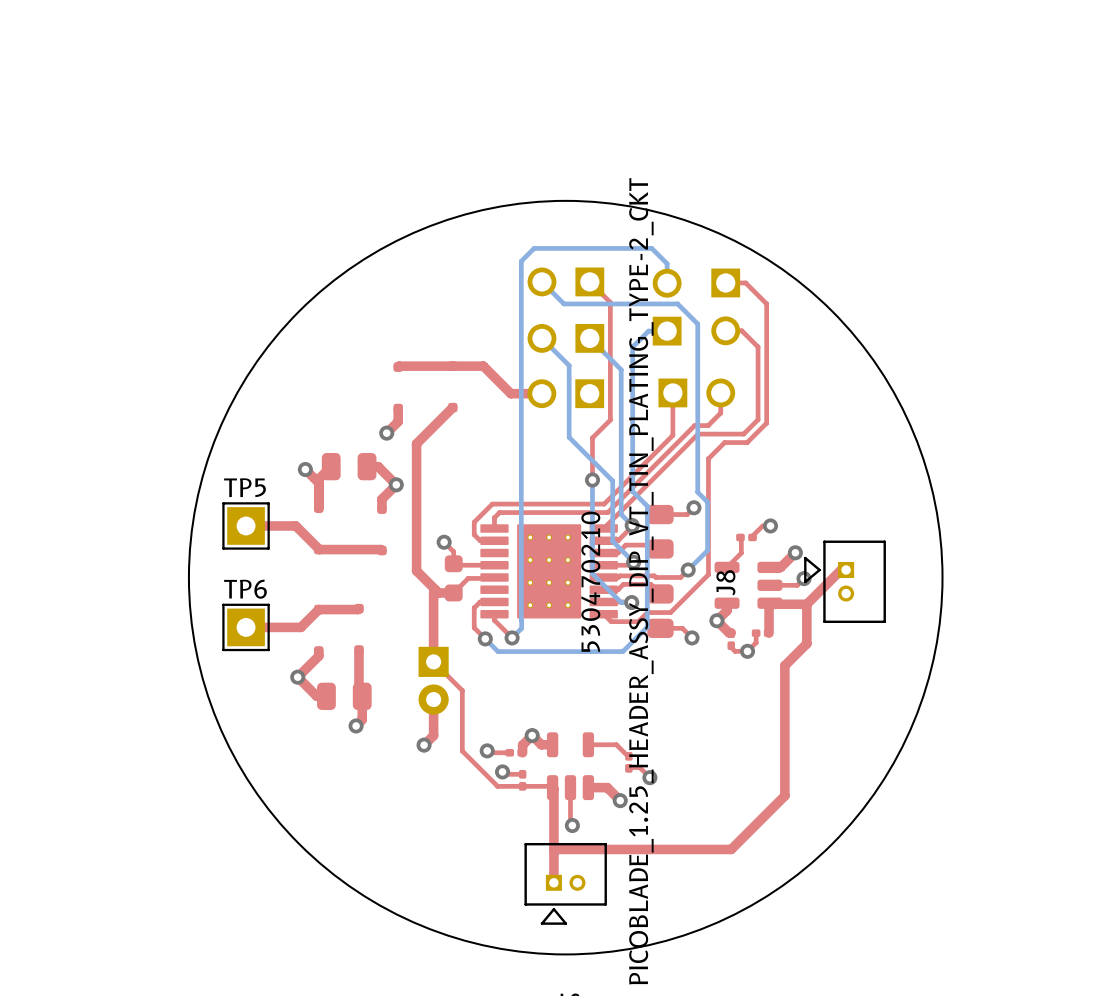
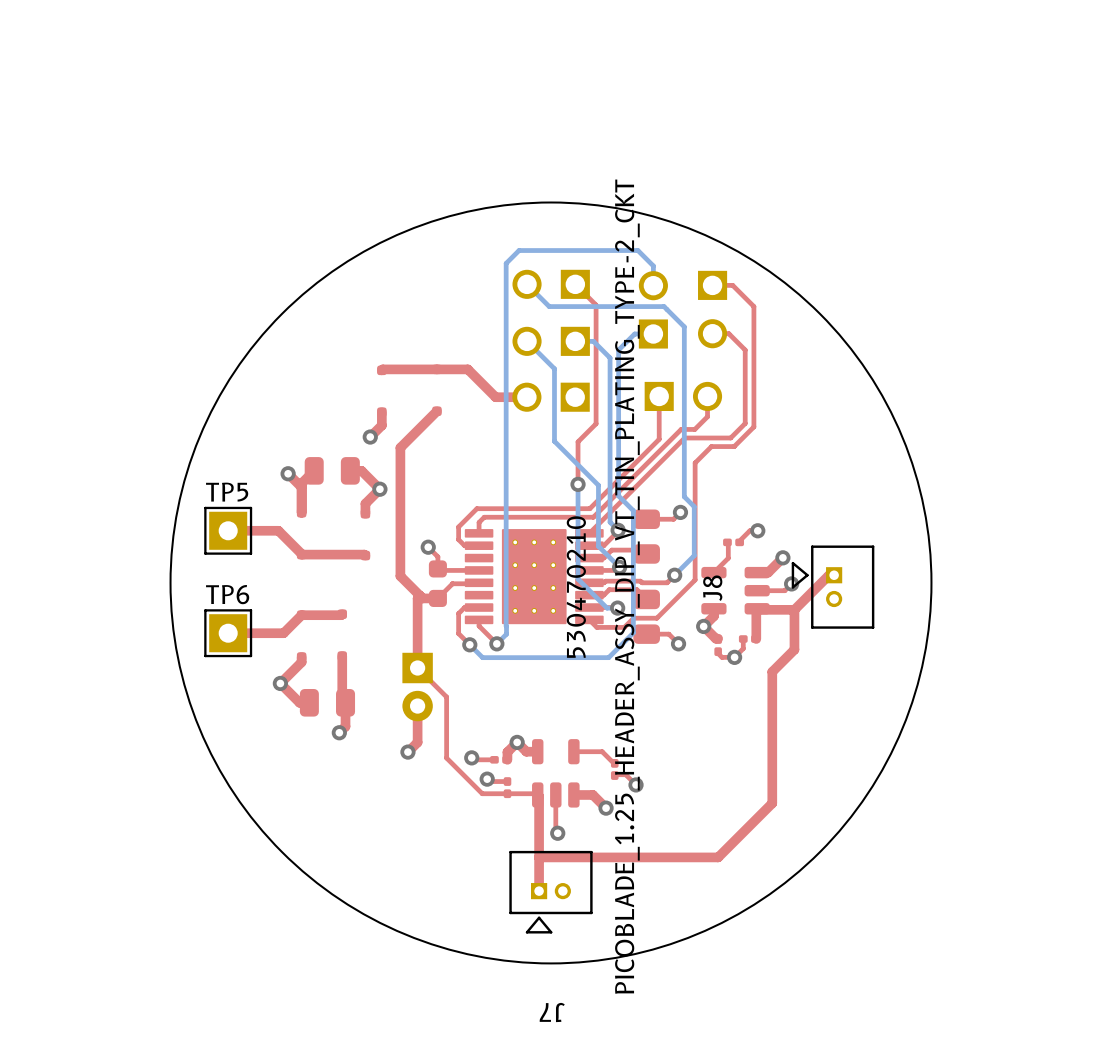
bottom track: (589, 338) (621, 369) (621, 514) (624, 517) -> (575, 341) (593, 341) (610, 357) (610, 522)

